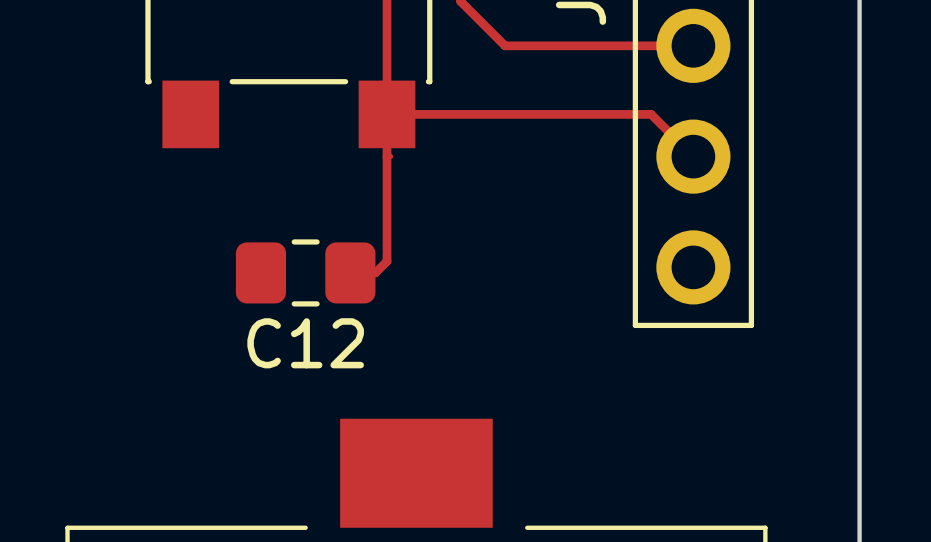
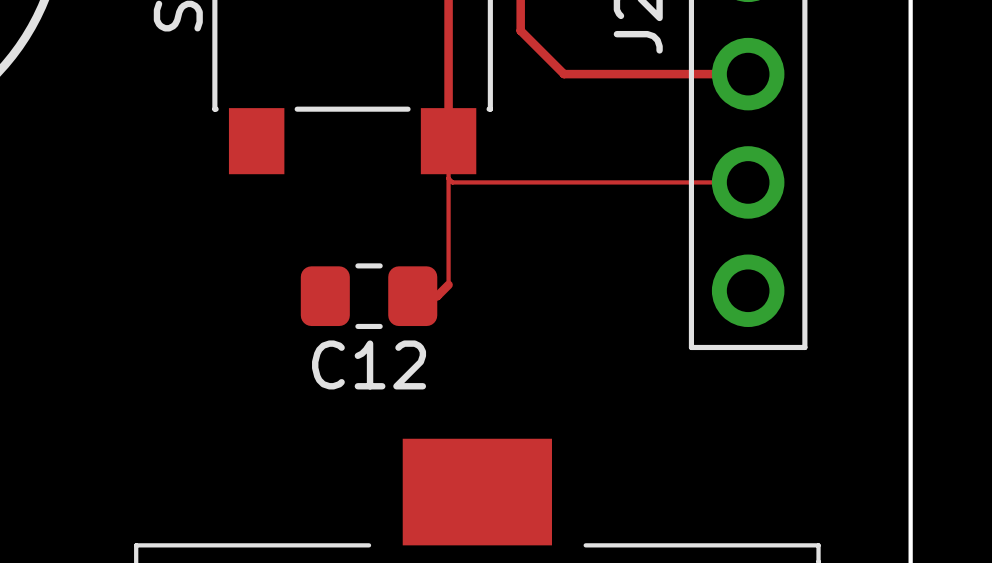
track: (693, 156) (651, 114) (387, 114) (387, 261) -> (748, 182) (452, 182)

